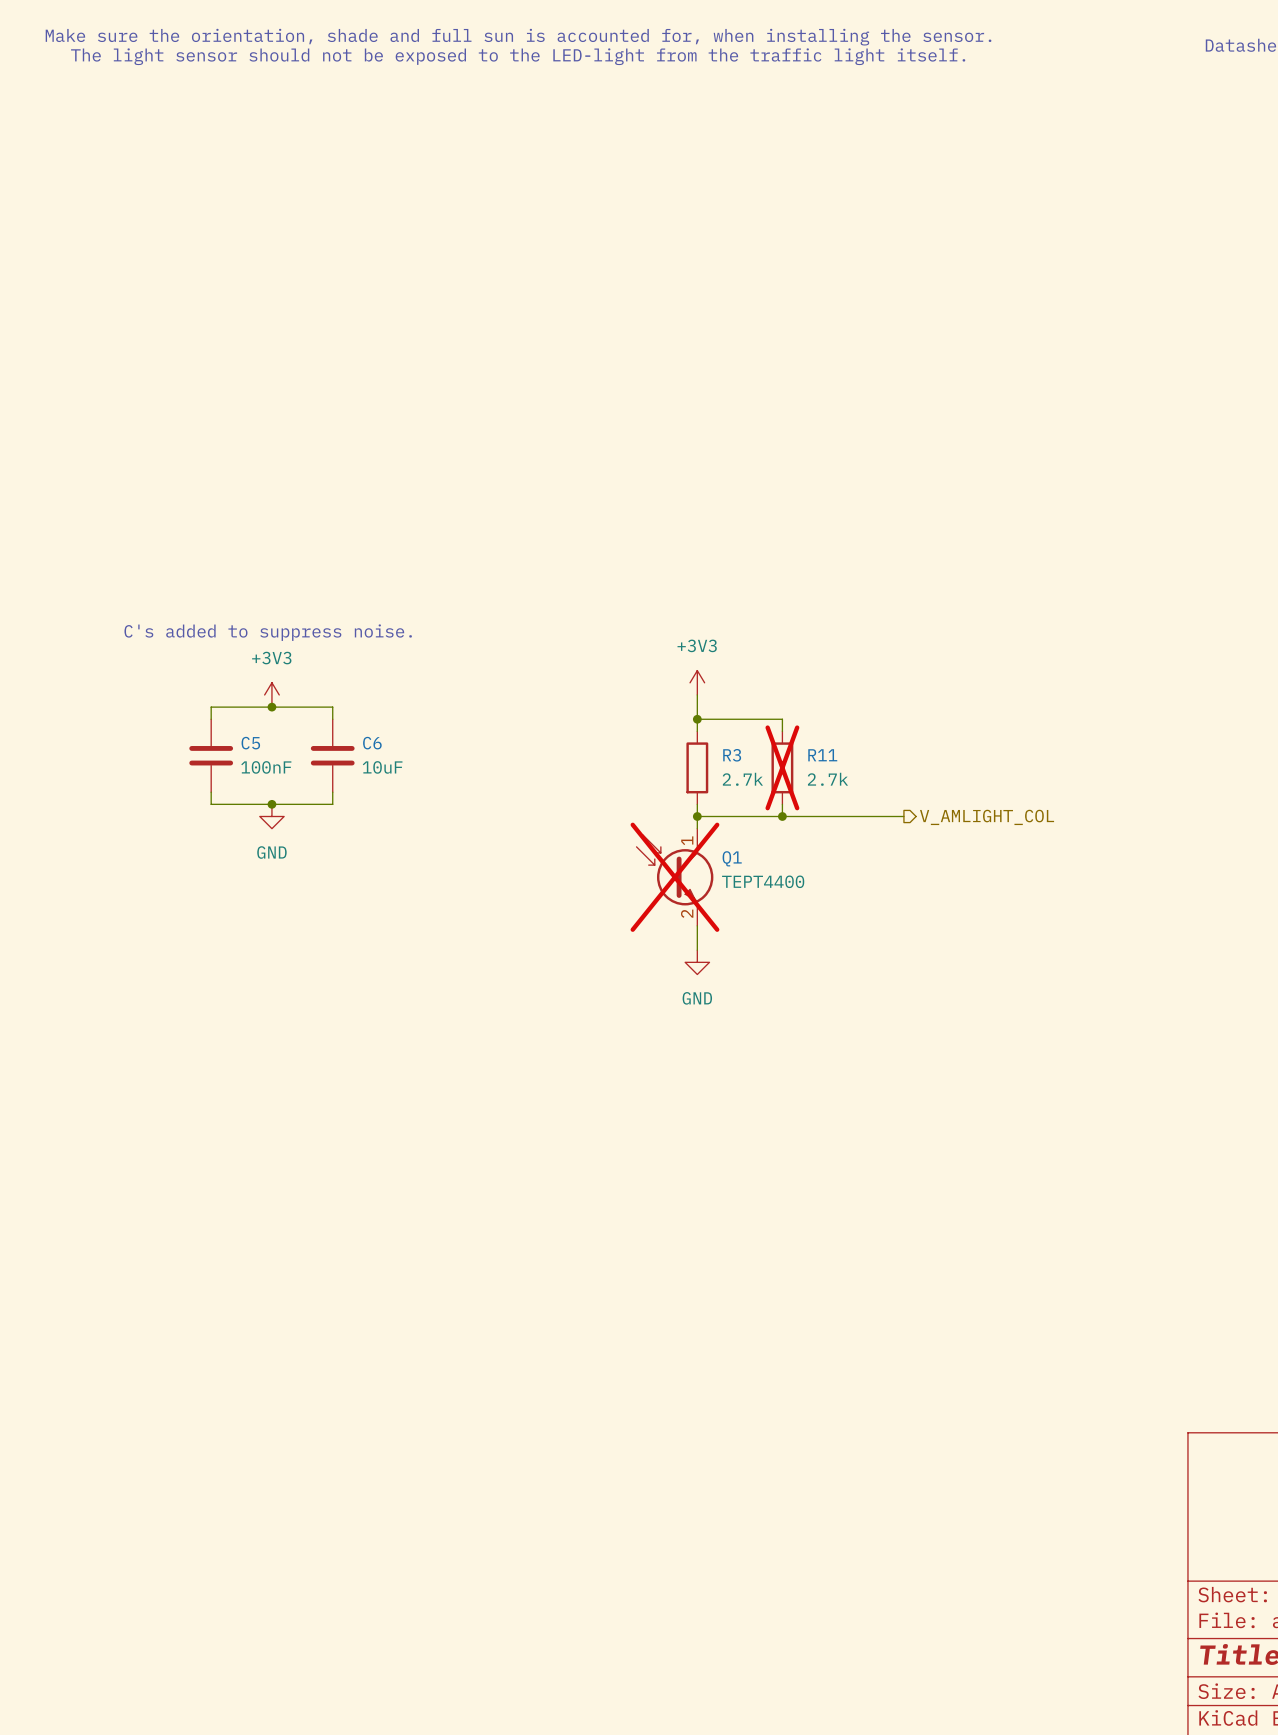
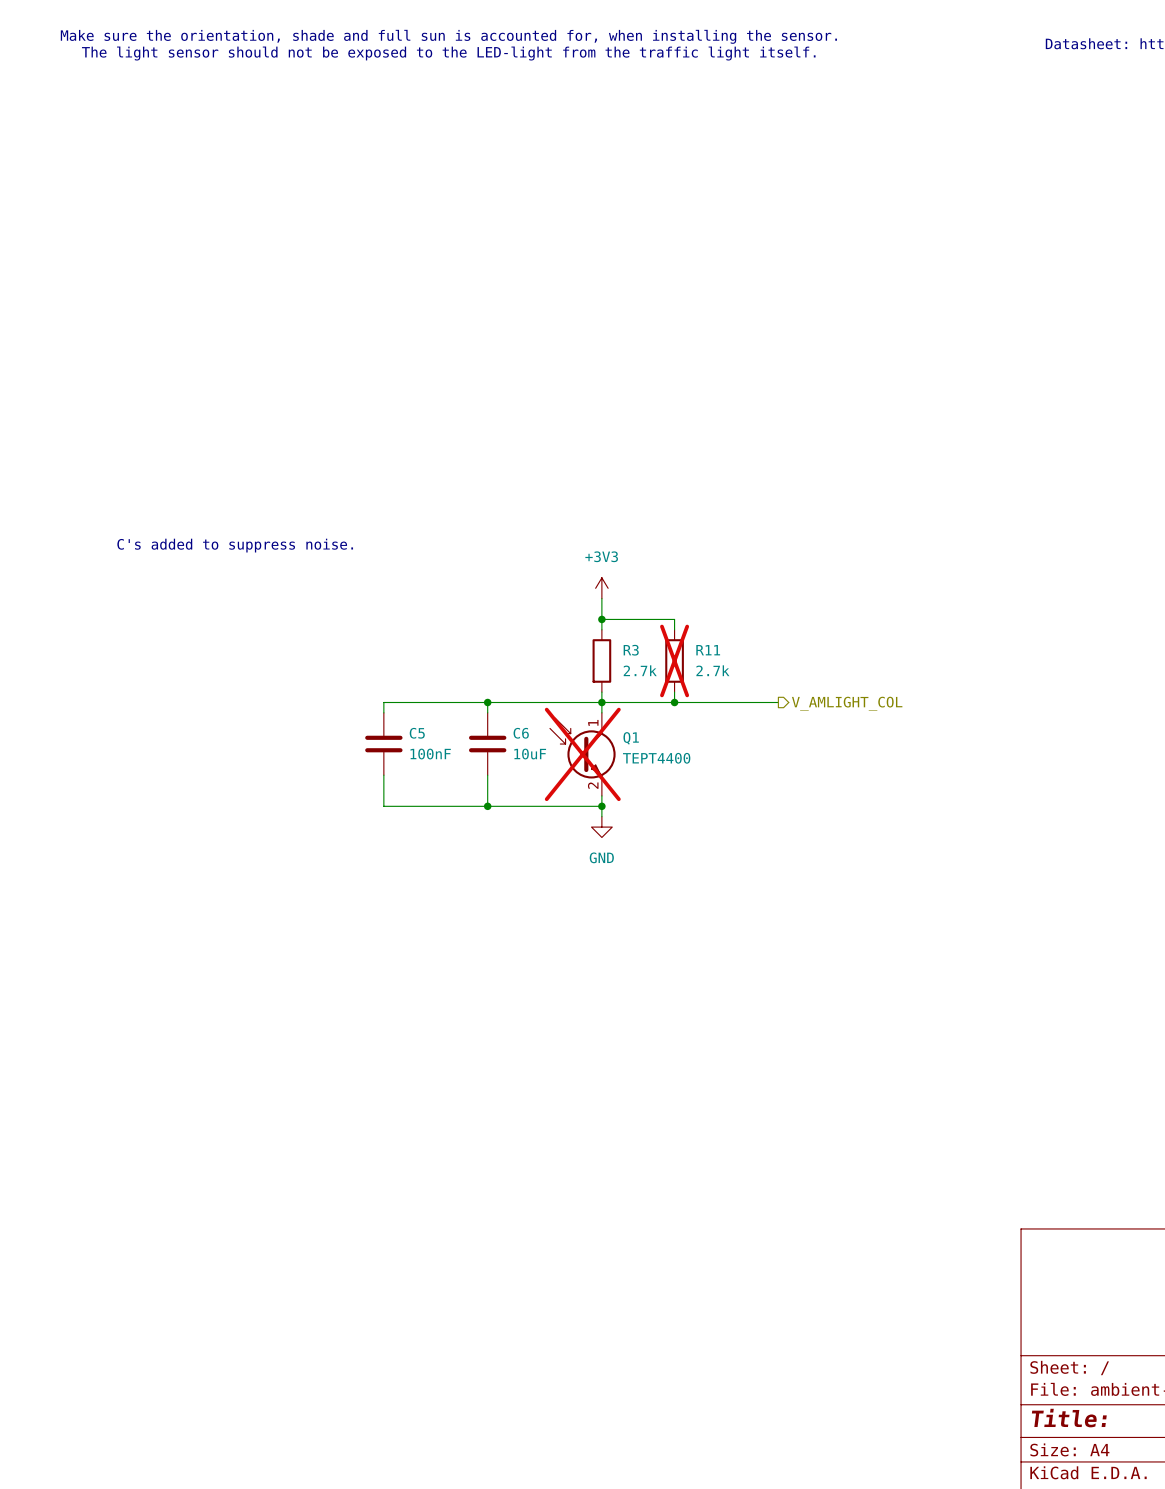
power symbol: +3V3 (271, 694) -> none
junction: (271, 707) -> none
wire: (211, 719) (211, 707) (332, 707) (332, 719) -> none
C5 position: (211, 755) -> (383, 744)
C6 position: (332, 755) -> (487, 744)
wire: (211, 792) (211, 804) (332, 804) (332, 792) -> none
junction: (271, 804) -> none
power symbol: GND (271, 816) -> none
wire: none -> (487, 702) (487, 712)
junction: none -> (487, 702)
wire: none -> (601, 702) (383, 702) (383, 712)
wire: none -> (383, 775) (383, 806) (601, 806)
wire: none -> (487, 775) (487, 806)
junction: none -> (487, 806)
junction: none -> (601, 806)

